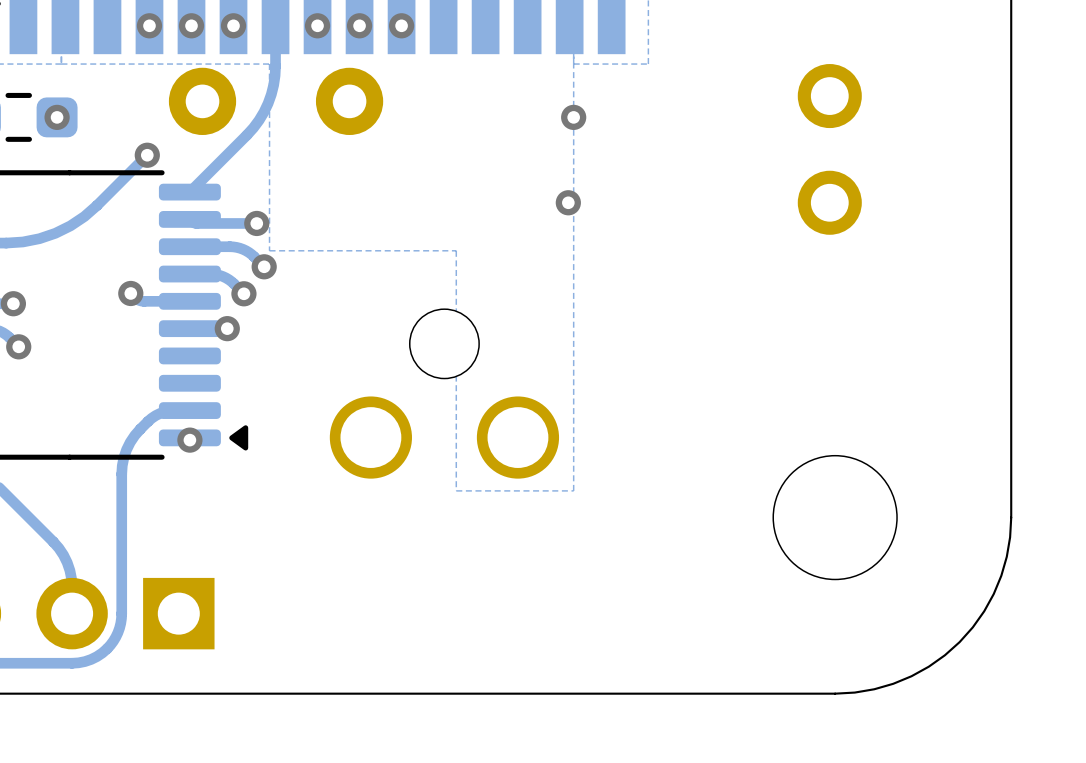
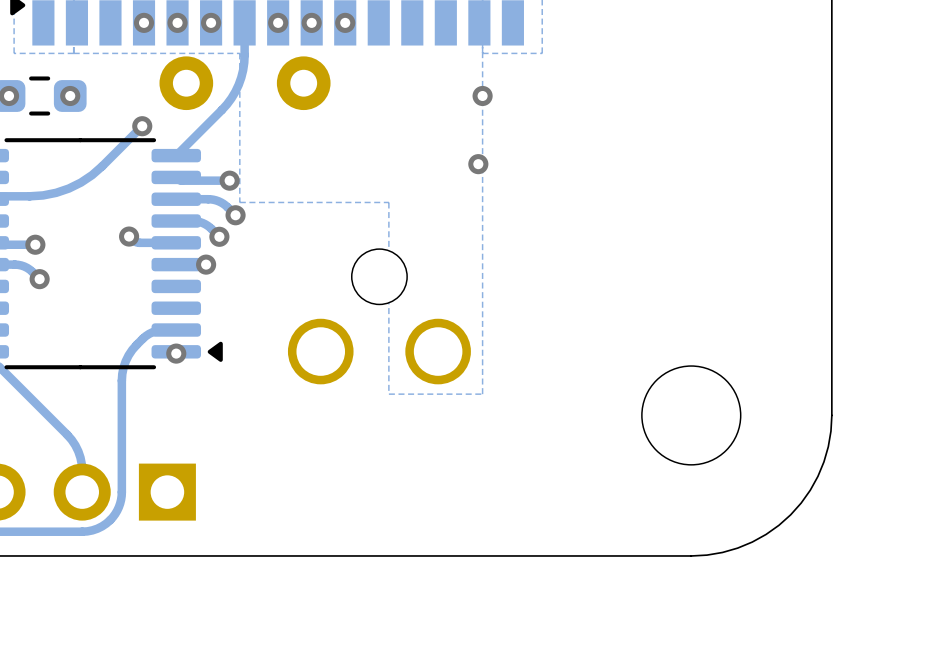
part: (829, 149) -> none

